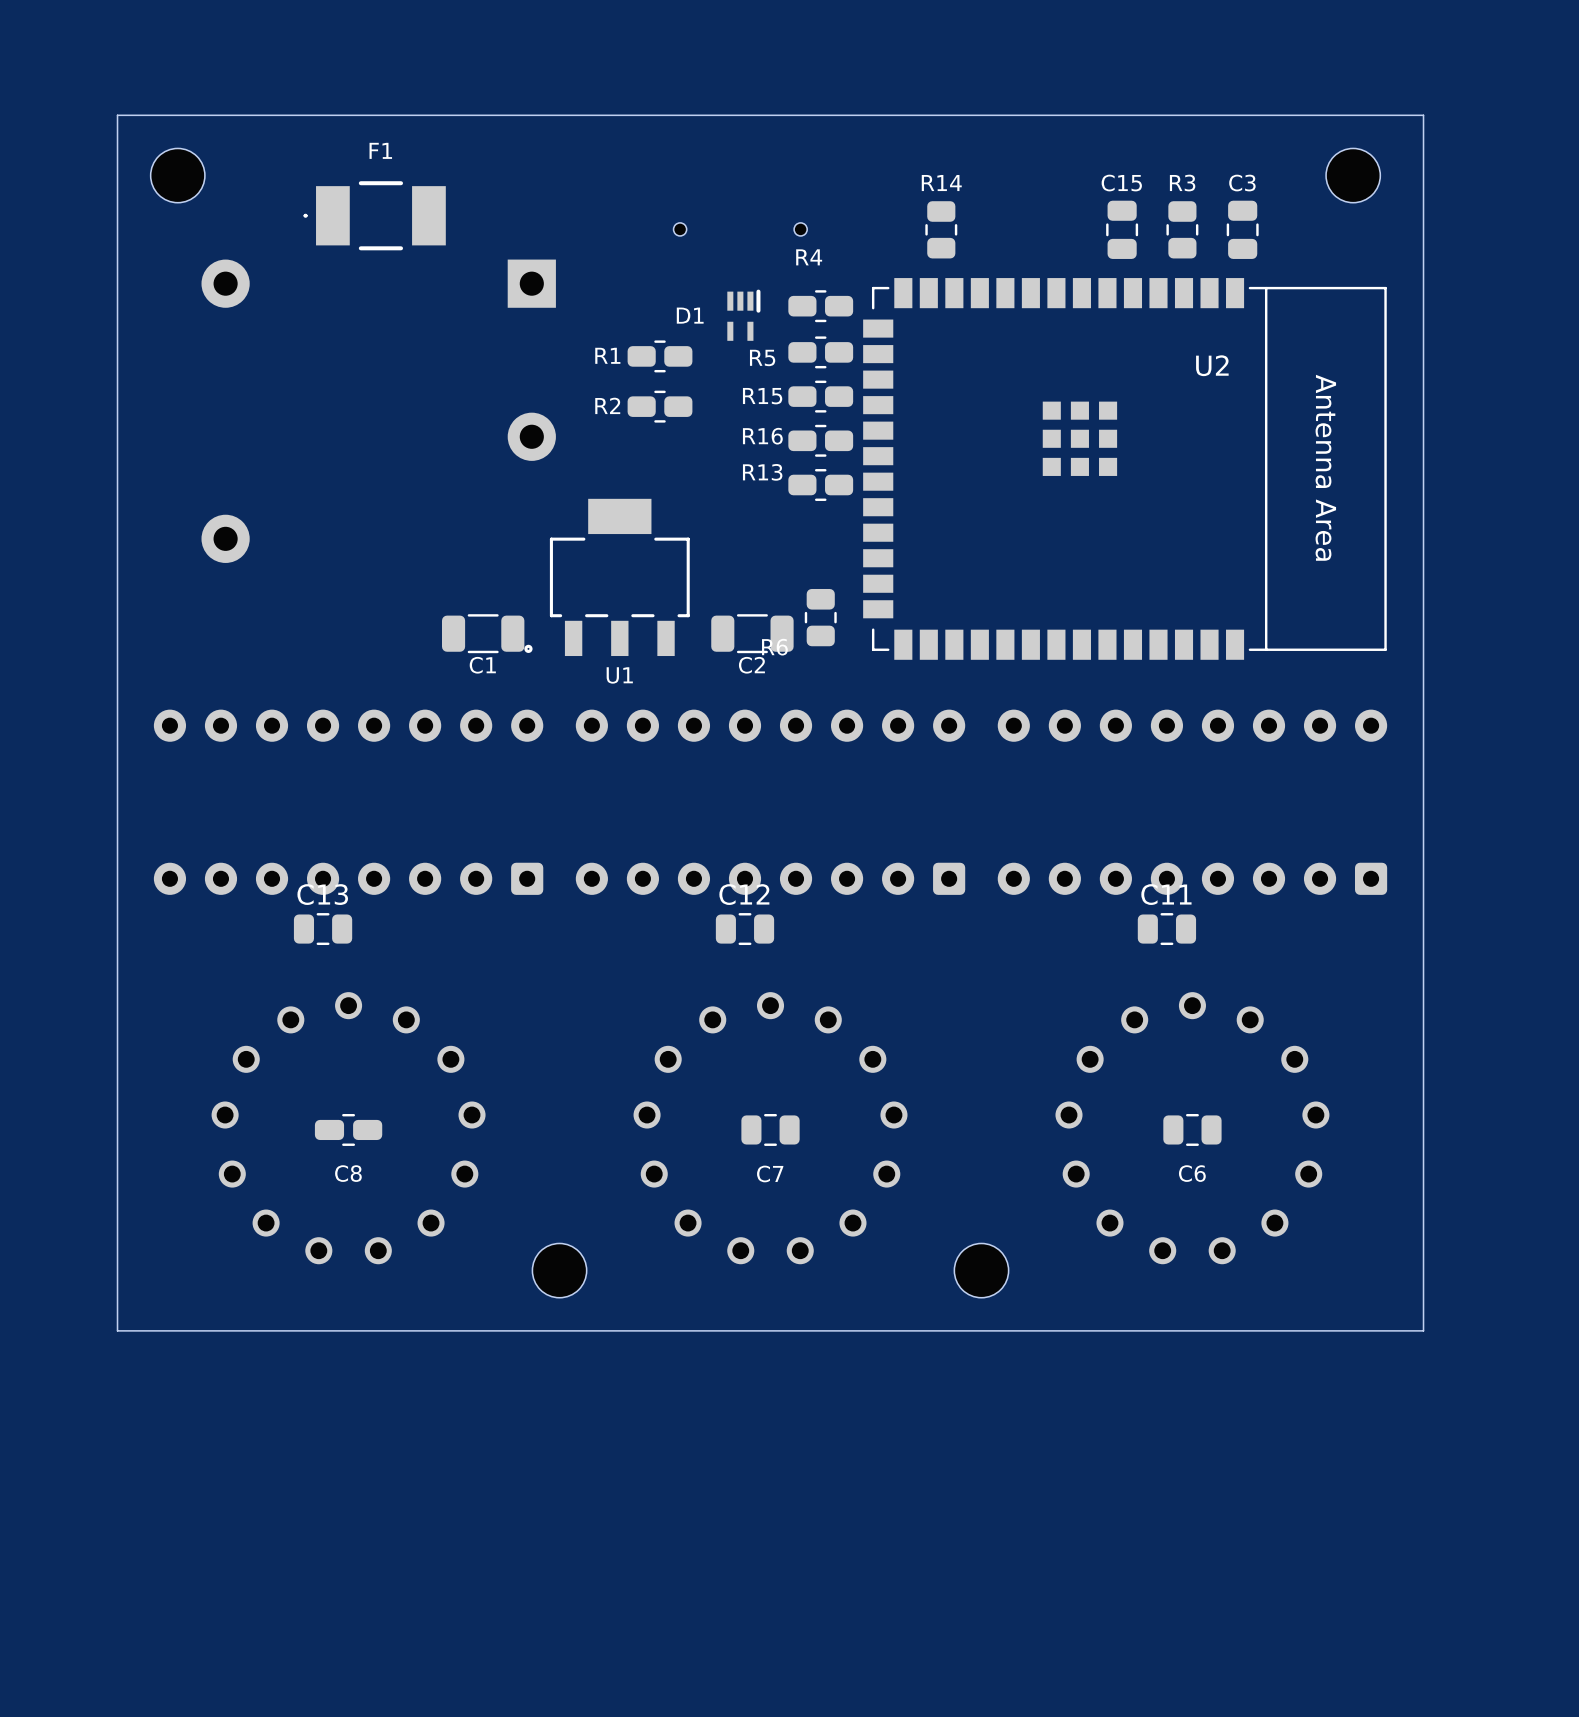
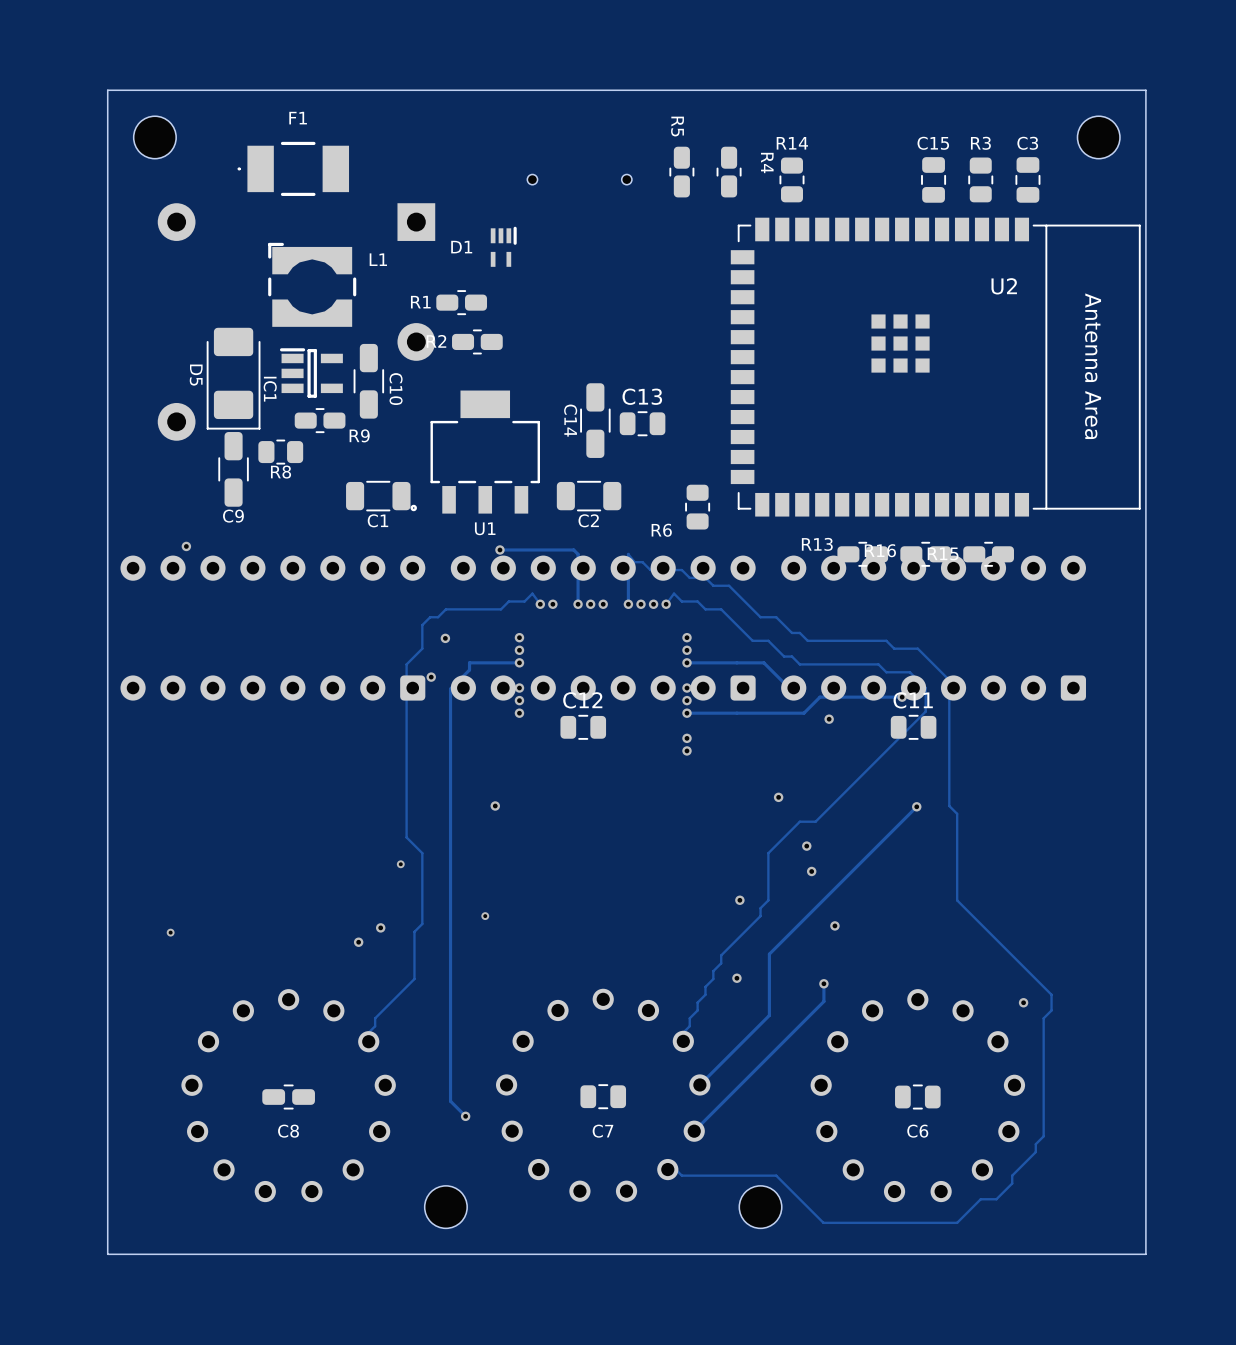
board edge: (1423, 115) (1423, 1330) (117, 1330) (117, 115) (137, 115) -> (1114, 90) (1145, 90) (1145, 1254) (107, 1254) (107, 90)
part position: (177, 175) -> (154, 137)
part position: (1353, 175) -> (1098, 137)
R14 position: (941, 229) -> (791, 179)
C15 position: (1122, 229) -> (933, 179)
R3 position: (1182, 229) -> (980, 179)
C3 position: (1242, 229) -> (1027, 179)
R4 rotation: 0° (820, 306) -> 90° clockwise (729, 172)
R4 position: (820, 306) -> (729, 172)
D1 position: (743, 315) -> (503, 246)
R5 rotation: 0° (820, 352) -> 90° clockwise (681, 172)
R5 position: (820, 352) -> (681, 172)
R1 position: (660, 356) -> (461, 302)
L1: none -> (312, 284)
R15 position: (820, 396) -> (988, 554)
R2 position: (660, 406) -> (477, 341)
R16 position: (820, 440) -> (925, 554)
U2 position: (1124, 468) -> (935, 367)
IC1: none -> (311, 373)
D5: none -> (233, 378)
R13 position: (820, 485) -> (862, 554)
C10: none -> (368, 381)
R9: none -> (320, 420)
C14: none -> (595, 420)
R8: none -> (280, 452)
C9: none -> (233, 469)
R6 position: (820, 617) -> (697, 507)
via: none -> (186, 546)
track: none -> (499, 549) (573, 549) (578, 554) (578, 604)
via: none -> (499, 549)
track: none -> (540, 604) (532, 593) (524, 601) (508, 601) (500, 609) (445, 609) (438, 617) (430, 617) (422, 625) (422, 648) (406, 664) (406, 837) (422, 853) (422, 923) (414, 931) (414, 979) (375, 1018) (375, 1026) (367, 1034) (368, 1041)
via: none -> (540, 604)
via: none -> (552, 604)
via: none -> (578, 604)
via: none -> (590, 604)
via: none -> (603, 604)
track: none -> (628, 604) (628, 554) (634, 562) (642, 562) (650, 570) (681, 570) (689, 577) (705, 577) (713, 585) (729, 585) (760, 617) (776, 617) (791, 632) (799, 632) (807, 640) (886, 640) (894, 648) (917, 648) (949, 680) (949, 805) (957, 813) (957, 900) (1051, 994) (1051, 1010) (1043, 1018) (1043, 1136) (1035, 1144) (1035, 1152) (1012, 1175) (1012, 1183) (996, 1199) (980, 1199) (957, 1222) (823, 1222) (776, 1175) (681, 1175) (674, 1167) (667, 1169)
via: none -> (628, 604)
via: none -> (640, 604)
via: none -> (653, 604)
track: none -> (666, 604) (674, 593) (681, 601) (697, 601) (705, 609) (721, 609) (752, 640) (768, 640) (784, 656) (791, 656) (799, 664) (878, 664) (886, 672) (909, 672) (925, 688) (925, 711) (815, 821) (799, 821) (768, 853) (768, 900) (760, 908) (760, 916) (721, 955) (721, 963) (713, 971) (713, 979) (705, 986) (705, 994) (697, 1002) (697, 1010) (689, 1018) (689, 1026) (681, 1034) (683, 1041)
via: none -> (666, 604)
via: none -> (519, 637)
via: none -> (686, 637)
via: none -> (445, 638)
via: none -> (519, 650)
via: none -> (686, 650)
track: none -> (519, 662) (469, 662) (469, 670) (450, 689) (450, 1101) (465, 1116)
via: none -> (519, 662)
track: none -> (686, 662) (763, 662) (785, 684)
via: none -> (686, 662)
via: none -> (431, 677)
via: none -> (519, 688)
via: none -> (686, 688)
track: none -> (902, 697) (820, 697) (803, 713) (686, 713)
via: none -> (902, 697)
via: none -> (519, 700)
via: none -> (686, 700)
via: none -> (519, 713)
via: none -> (686, 713)
via: none -> (829, 719)
C13 position: (323, 929) -> (642, 423)
via: none -> (686, 738)
via: none -> (686, 750)
via: none -> (778, 797)
via: none -> (495, 805)
track: none -> (916, 806) (769, 954) (769, 1015) (699, 1084)
via: none -> (916, 806)
via: none -> (806, 846)
via: none -> (400, 864)
via: none -> (811, 871)
part: (348, 1128) -> none
part: (770, 1128) -> none
part: (1192, 1128) -> none
C8 position: (348, 1129) -> (288, 1097)
C7 position: (770, 1129) -> (603, 1096)
C6 position: (1192, 1129) -> (917, 1097)
via: none -> (739, 900)
via: none -> (485, 916)
via: none -> (834, 925)
via: none -> (380, 927)
via: none -> (170, 932)
via: none -> (358, 942)
via: none -> (736, 978)
track: none -> (823, 983) (823, 1001) (694, 1131)
via: none -> (823, 983)
part: (559, 1270) -> none
part: (981, 1270) -> none
via: none -> (1023, 1002)
part: none -> (288, 1095)
part: none -> (603, 1095)
part: none -> (917, 1095)
via: none -> (465, 1116)
part: none -> (445, 1207)
part: none -> (760, 1207)

